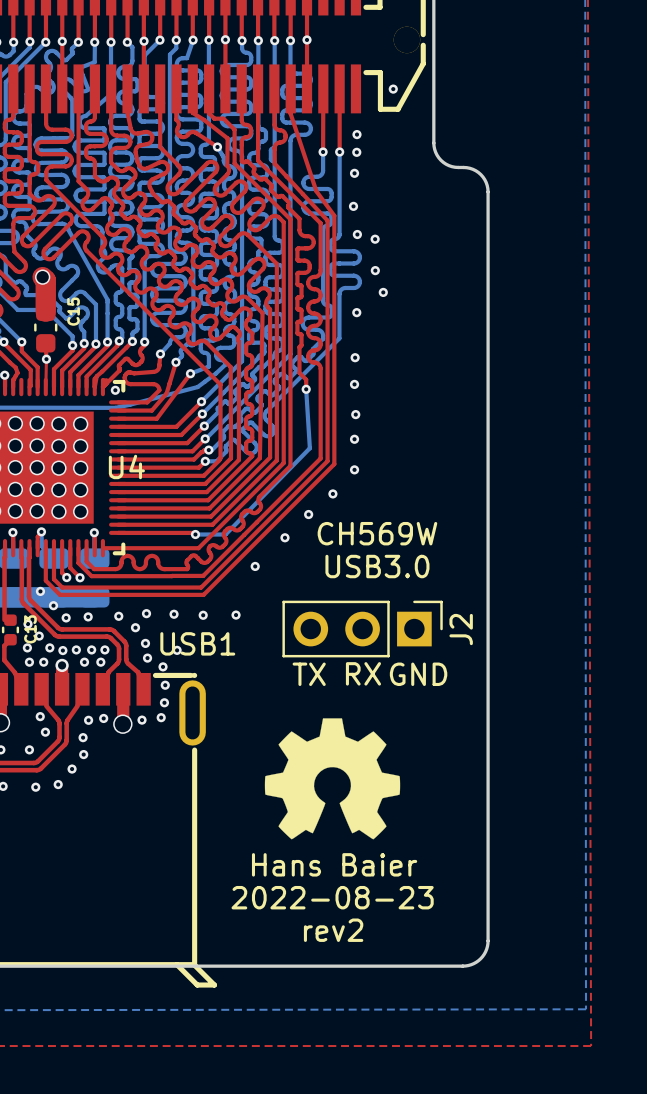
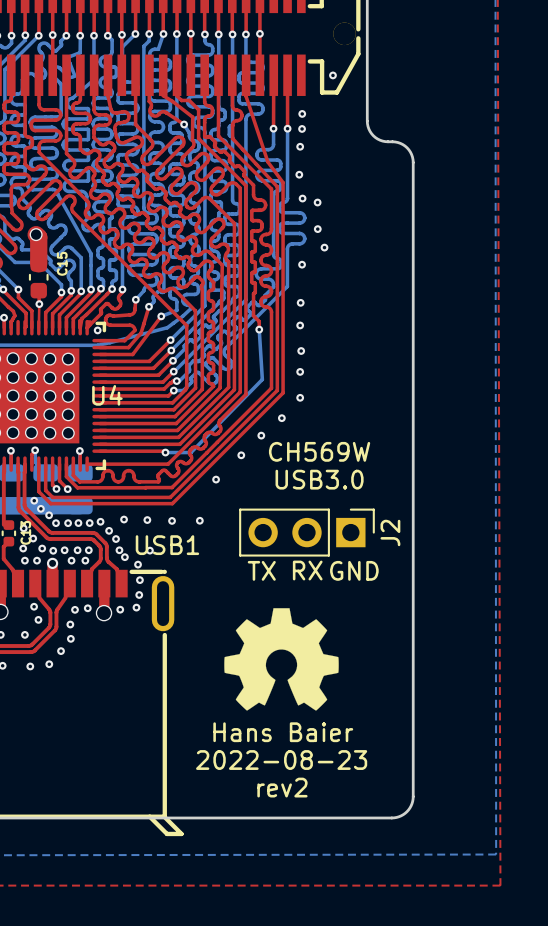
via: none -> (40, 508)
via: (53, 605) -> none
via: none -> (49, 515)
via: (88, 616) -> none
via: none -> (68, 523)
via: none -> (78, 523)
via: none -> (89, 523)
via: none -> (109, 530)
via: (135, 627) -> none
via: none -> (116, 539)
via: (145, 643) -> none
via: none -> (119, 550)

